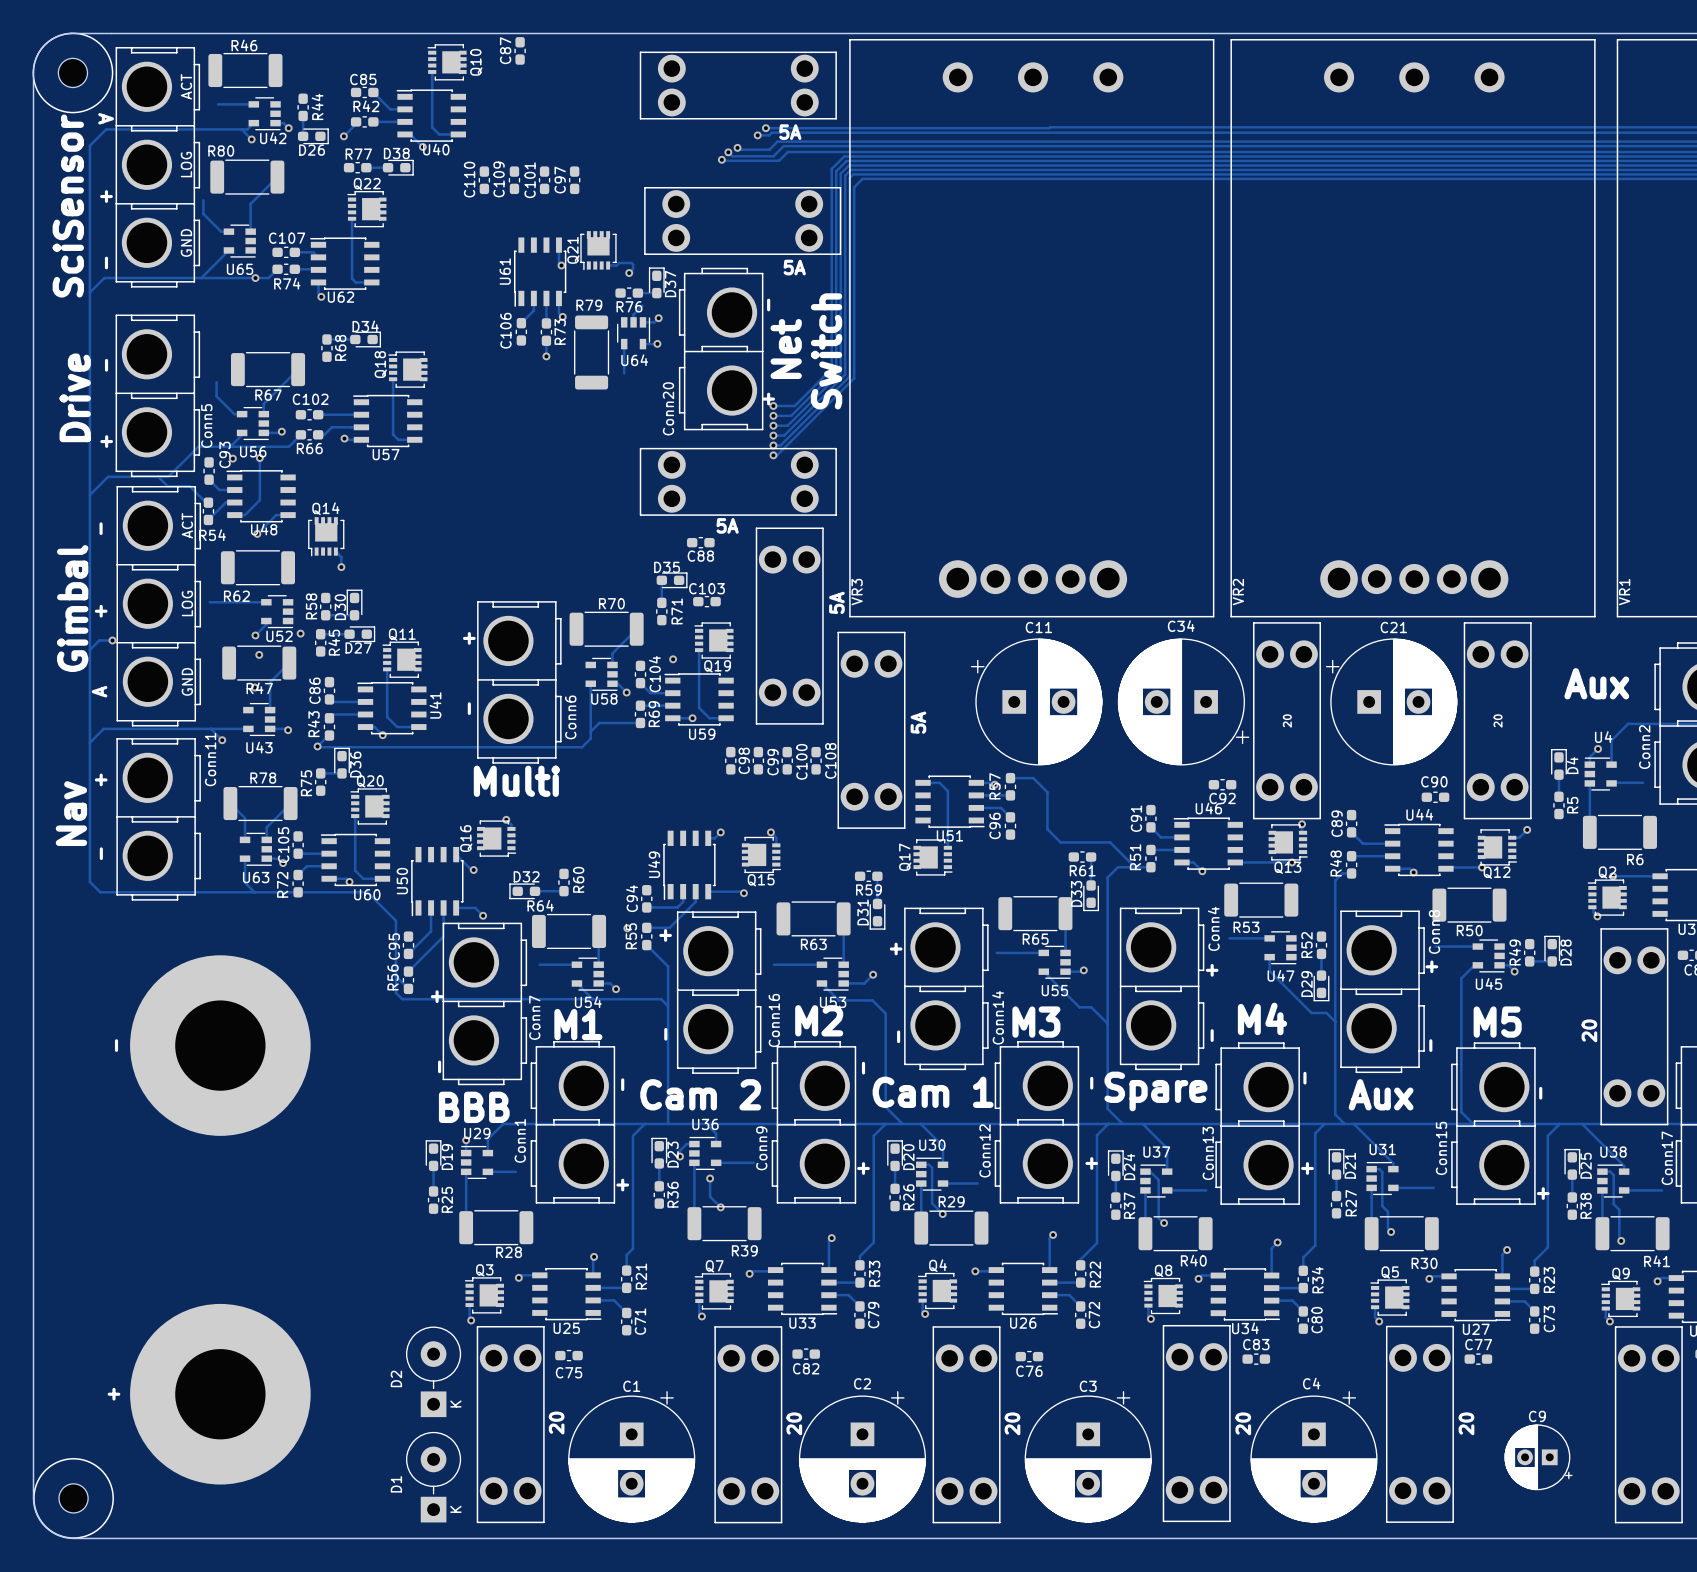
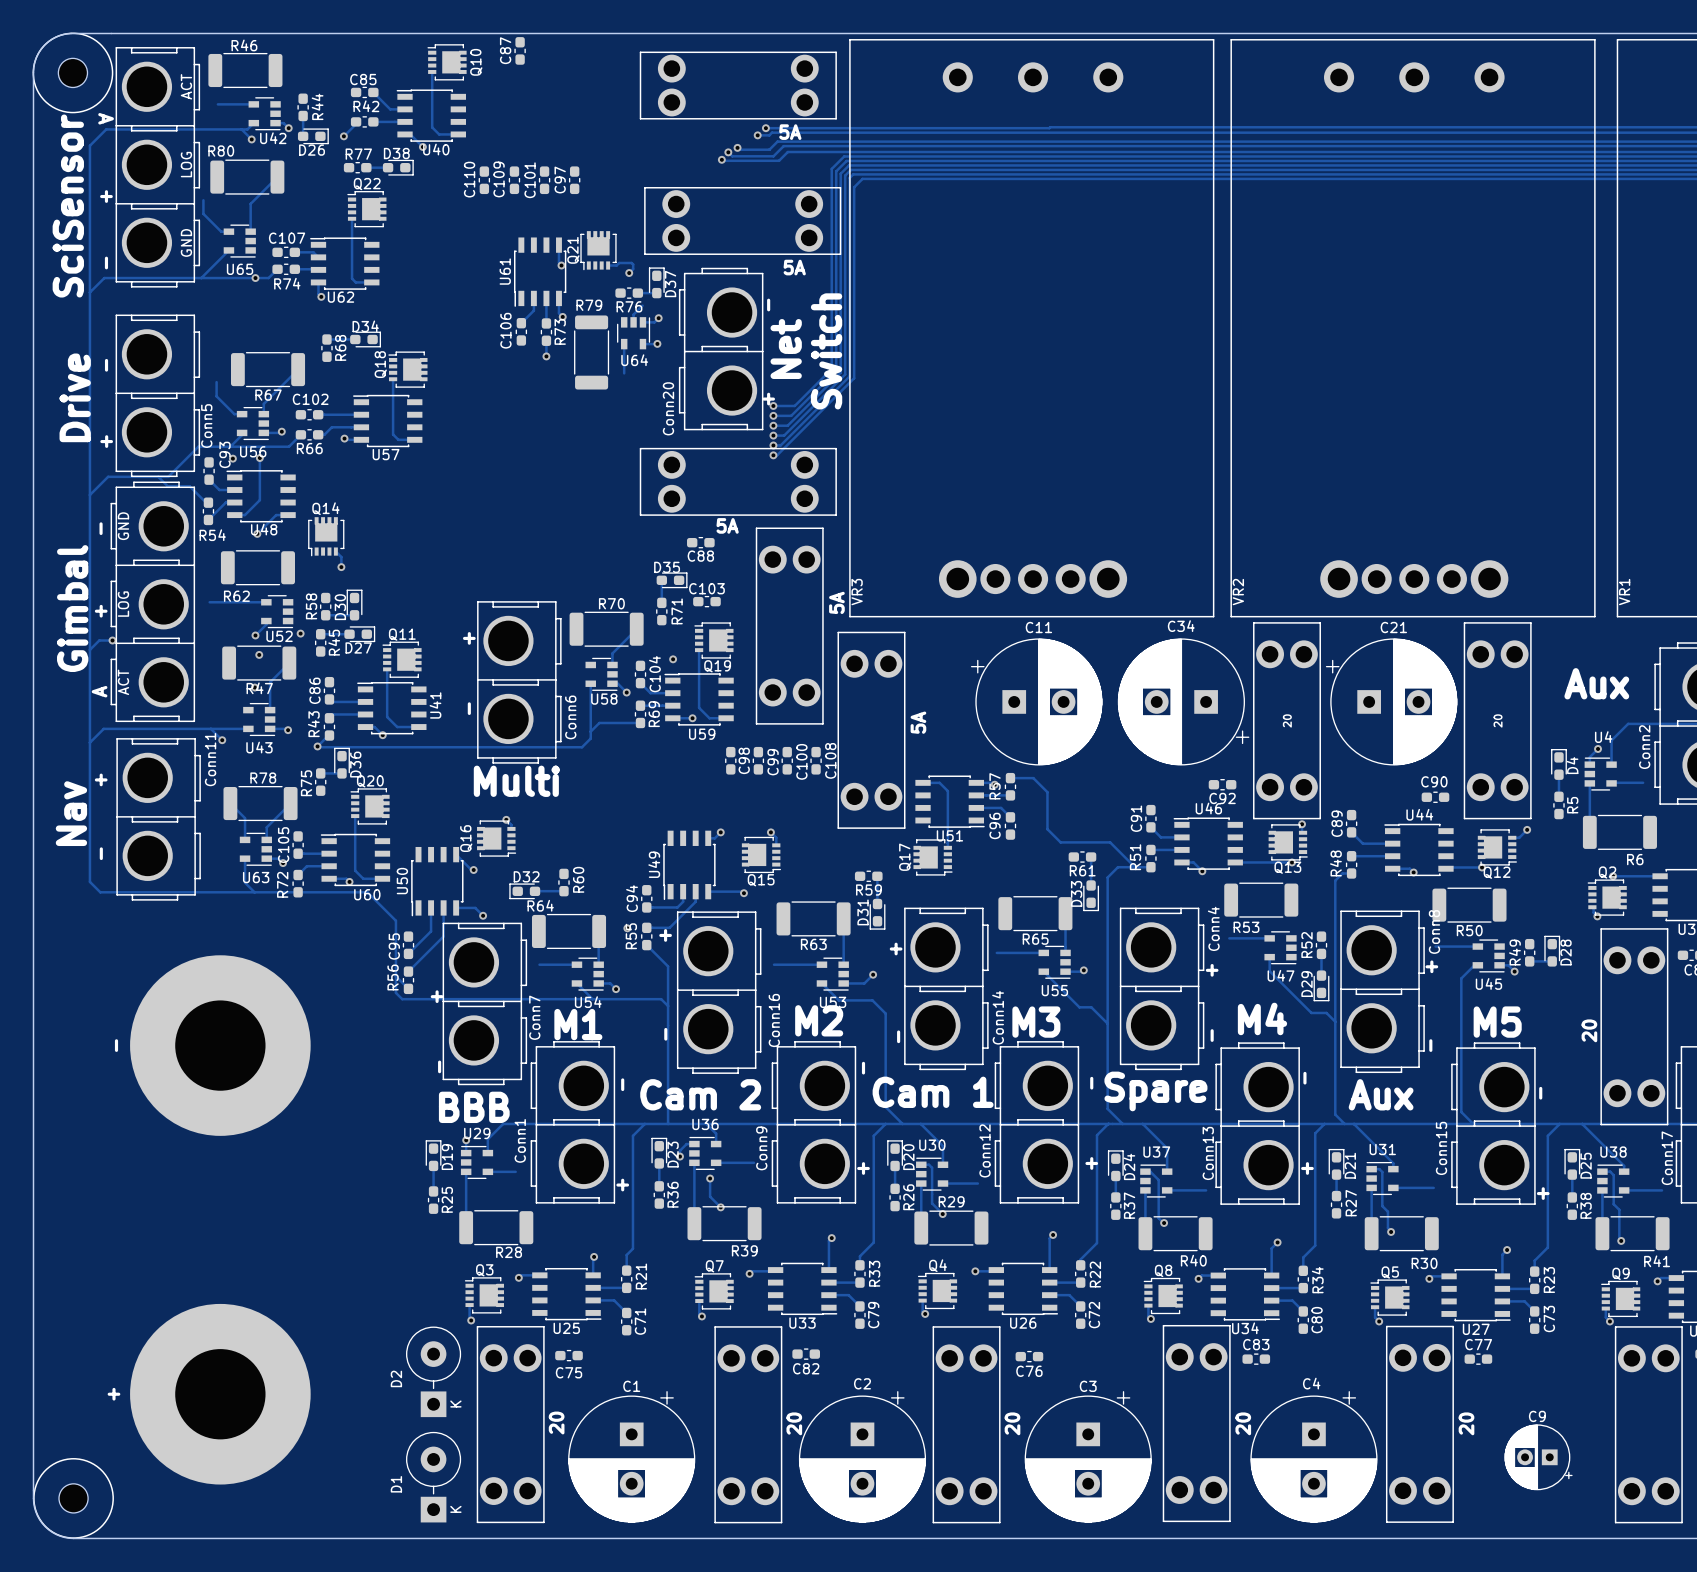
part rotation: 0° (158, 606) -> 180° (152, 601)

